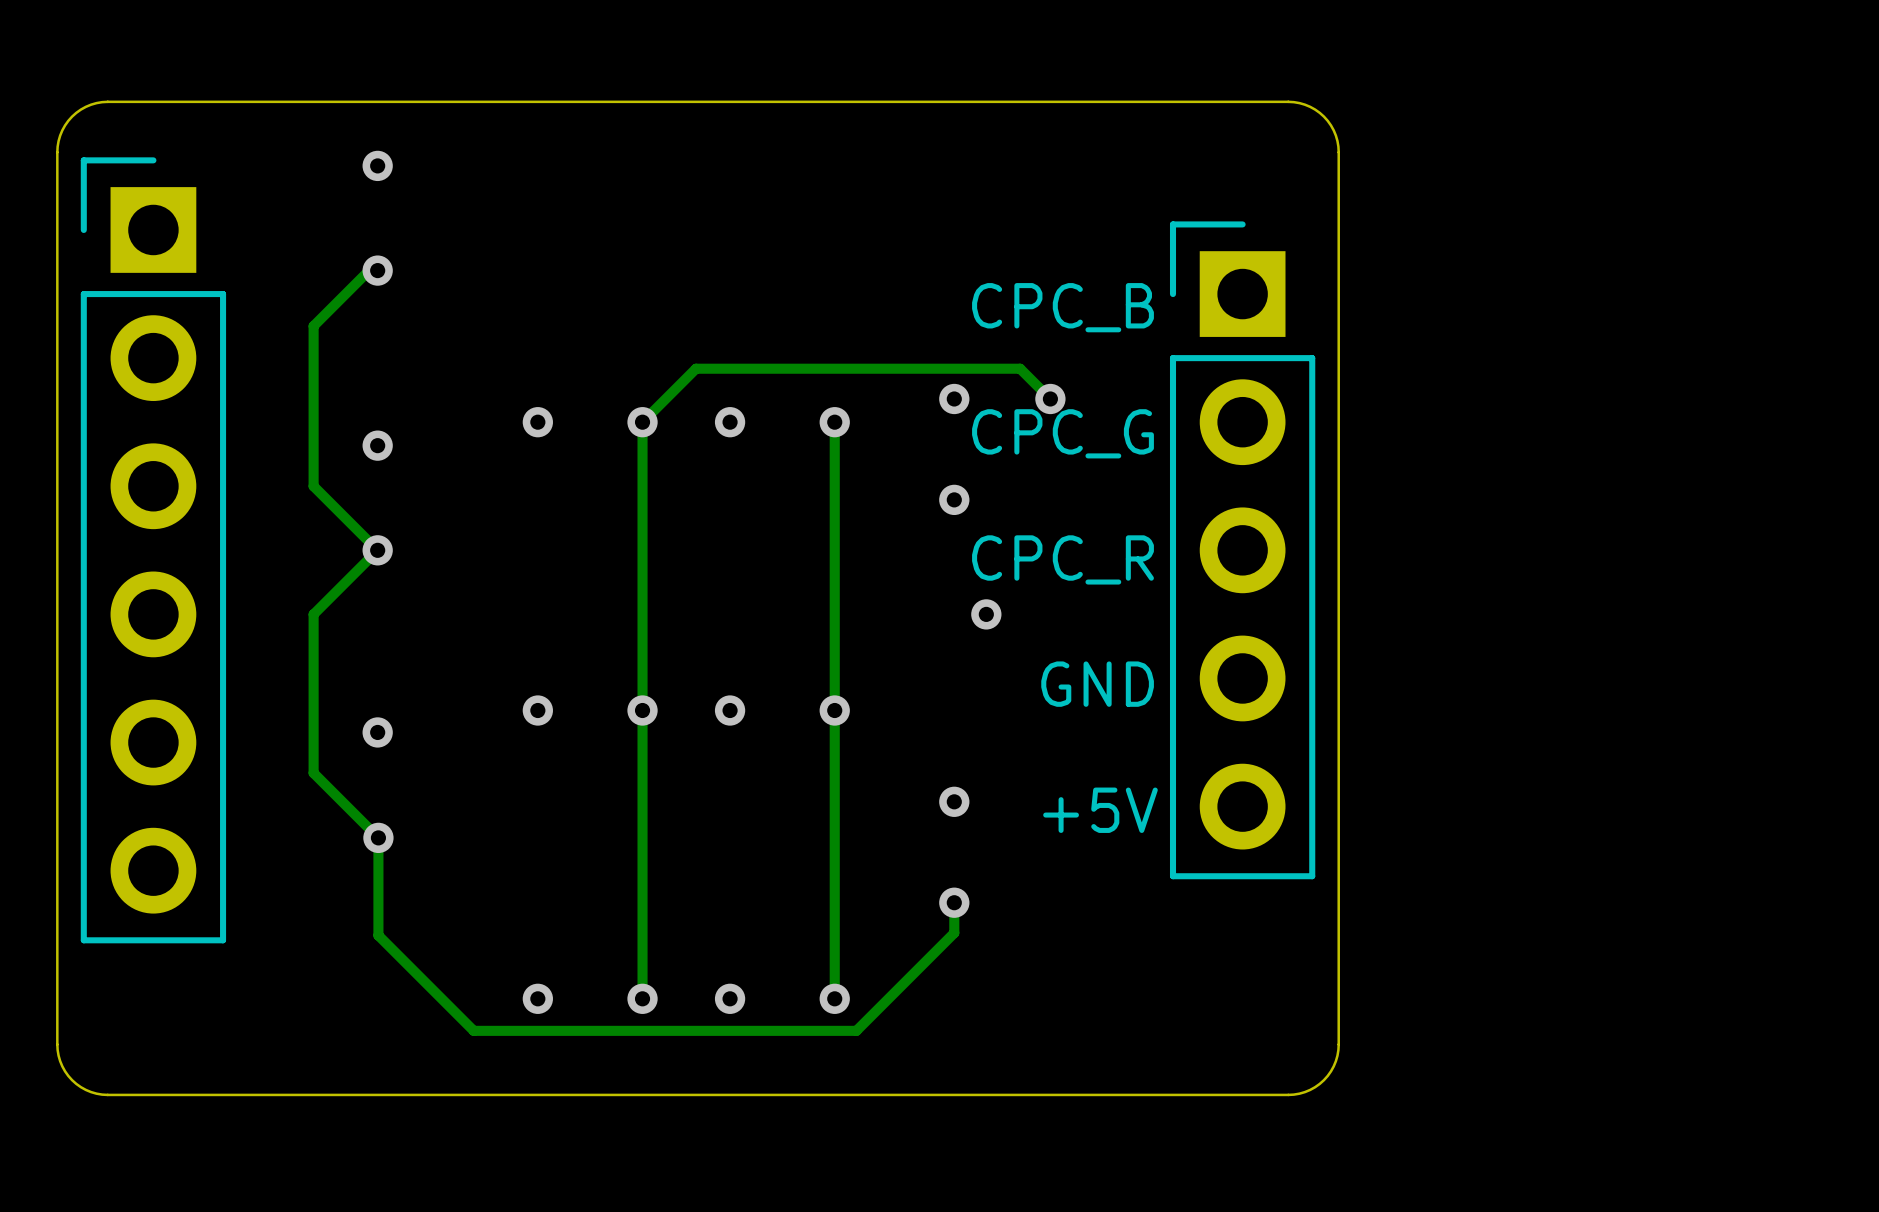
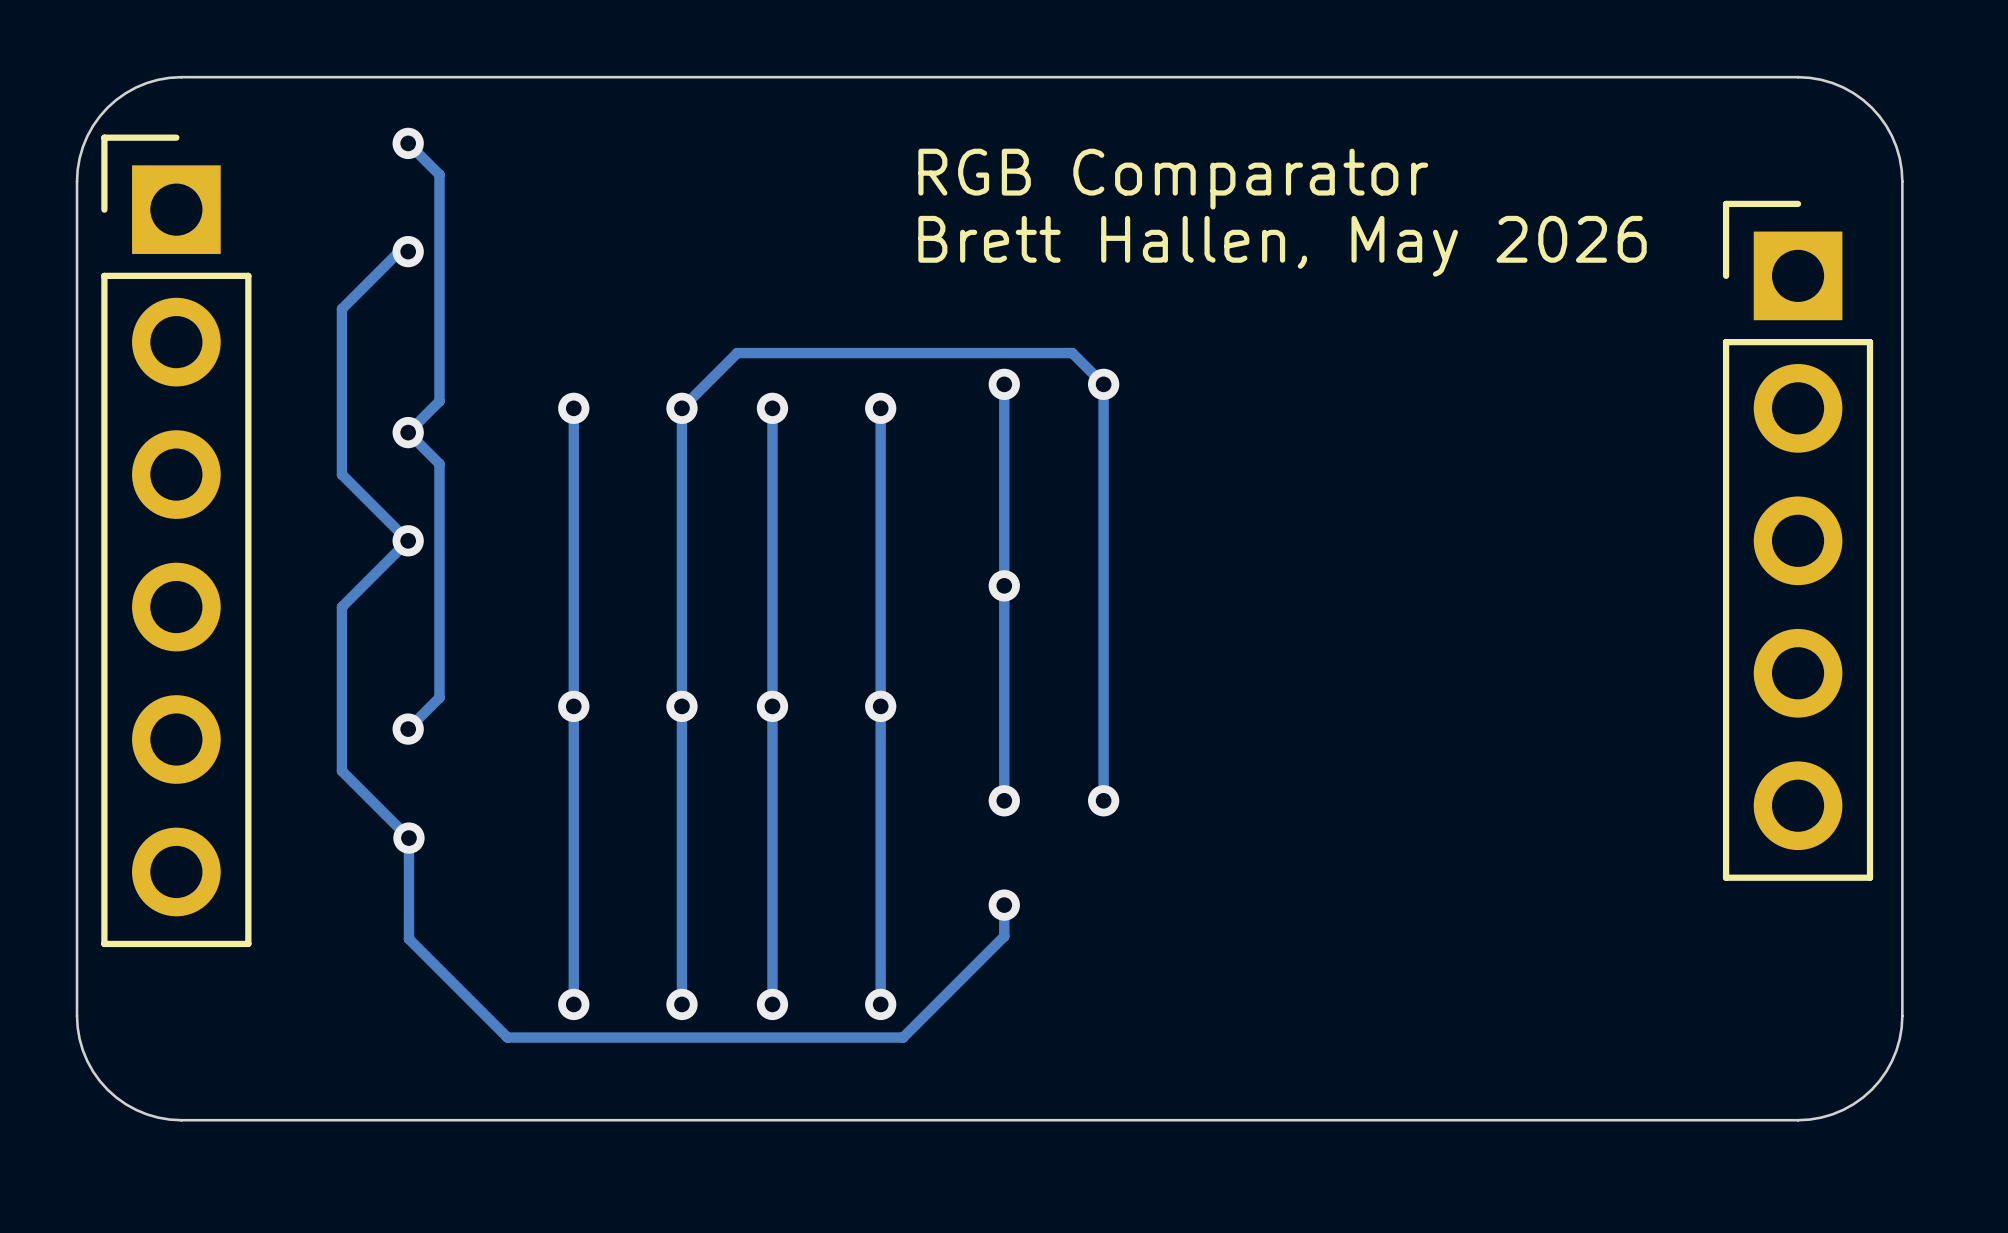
board edge: (158, 101) (96, 103) (80, 109) (72, 116) (62, 130) (58, 141) (57, 202) -> (181, 77) (146, 83) (125, 93) (107, 107) (87, 136) (79, 158) (77, 181)
board edge: (1288, 101) (1304, 104) (1323, 116) (1333, 130) (1338, 152) (1338, 1044) (1333, 1066) (1319, 1083) (1304, 1092) (1288, 1094) (102, 1094) (80, 1087) (72, 1080) (62, 1066) (57, 1050) (57, 1009) -> (1349, 77) (1809, 77) (1832, 83) (1853, 93) (1871, 107) (1892, 136) (1899, 158) (1902, 181) (1902, 1015) (1899, 1039) (1892, 1061) (1879, 1080) (1863, 1097) (1832, 1114) (1798, 1120) (181, 1120) (158, 1117) (136, 1109) (107, 1089) (93, 1071) (82, 1050) (77, 1015)
track: none -> (408, 143) (439, 174) (439, 401) (408, 432) (439, 463) (439, 697) (408, 729)
text: none -> RGB Comparator (1173, 179)
text: none -> Brett Hallen, May 2026 (1282, 246)
text: CPC_B (1062, 307) -> none
track: none -> (1004, 384) (1004, 800)
track: none -> (1103, 384) (1103, 800)
track: none -> (573, 408) (573, 1004)
track: none -> (772, 408) (772, 1004)
text: CPC_G (1062, 433) -> none
via: (954, 499) -> none
part position: (1242, 550) -> (1798, 540)
text: CPC_R (1062, 559) -> none
via position: (986, 614) -> (1004, 585)
text: GND (1097, 684) -> none
via: none -> (1103, 800)
text: +5V (1100, 810) -> none

